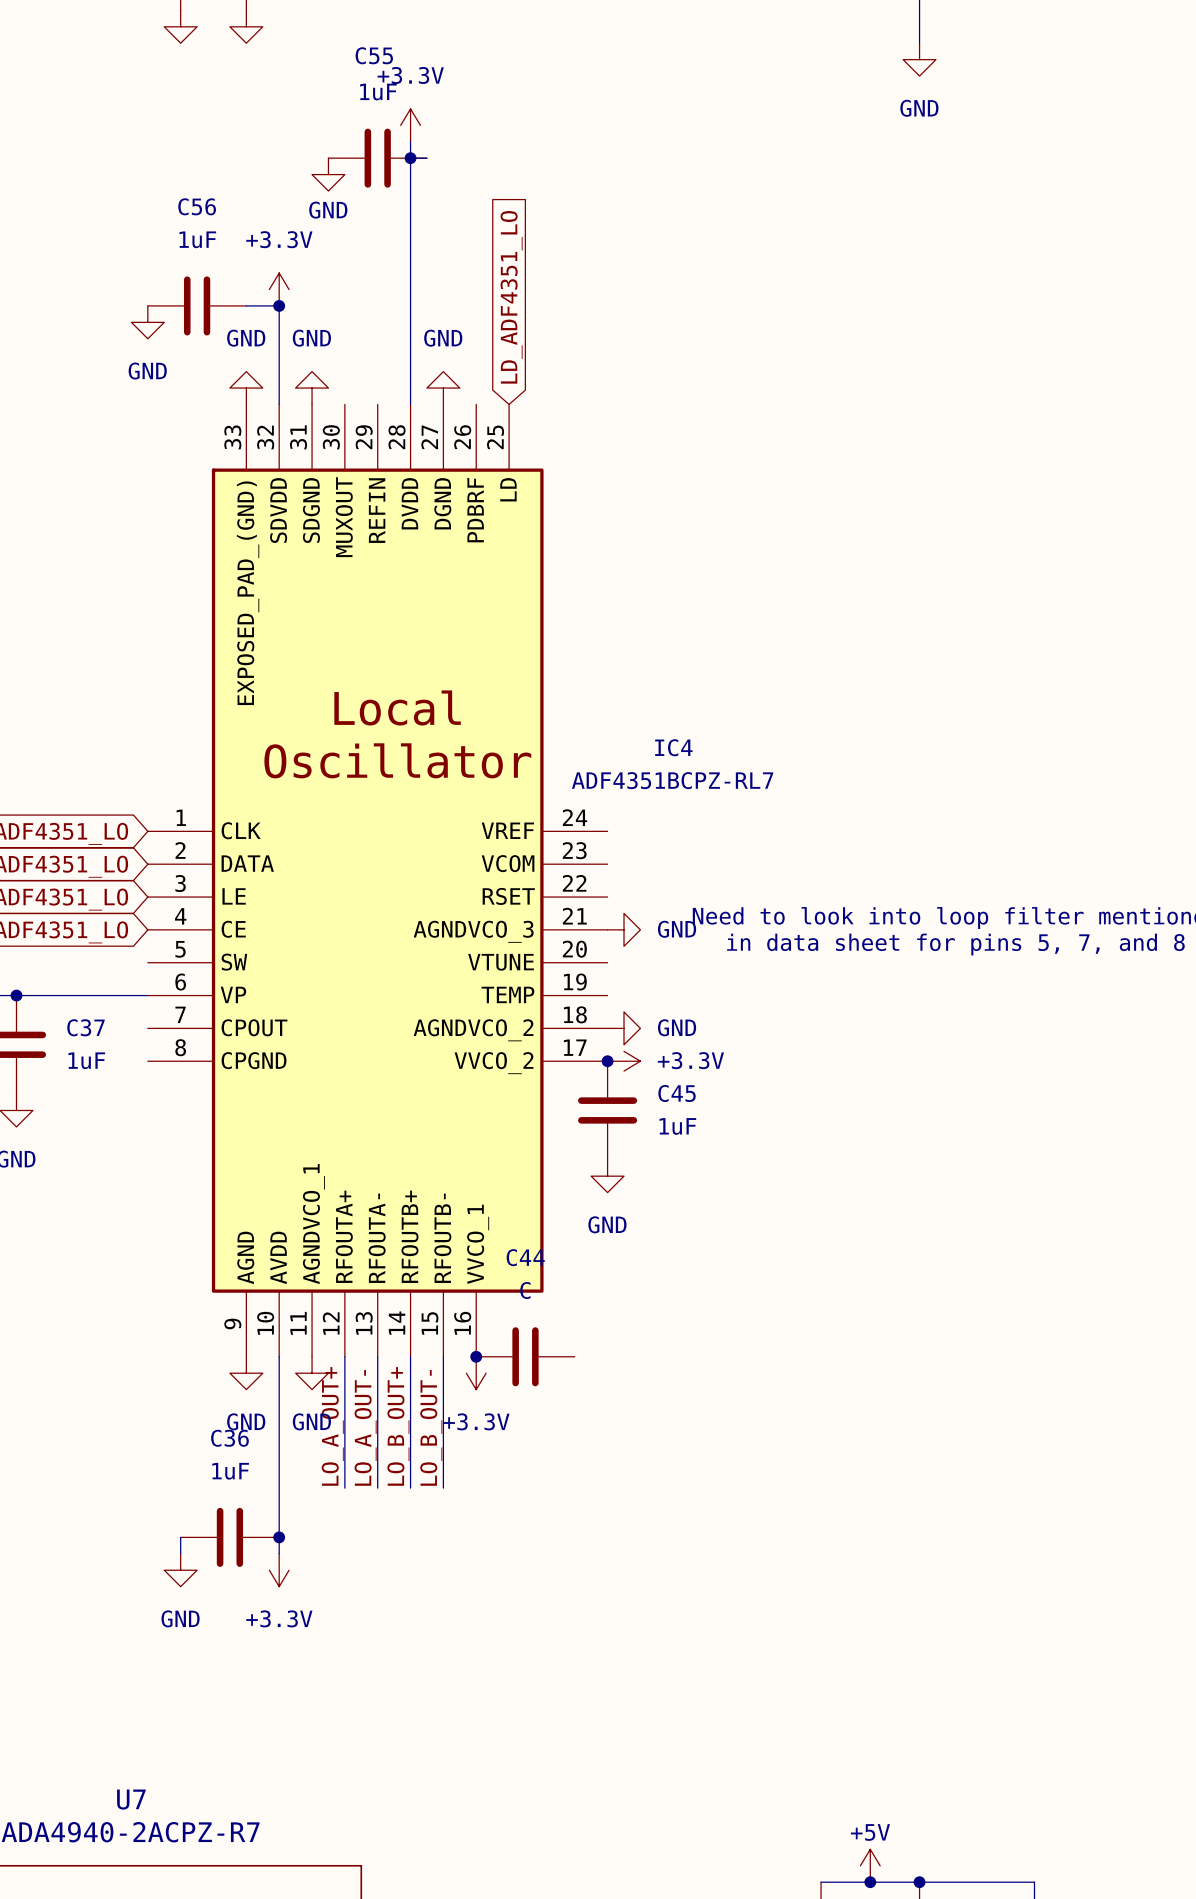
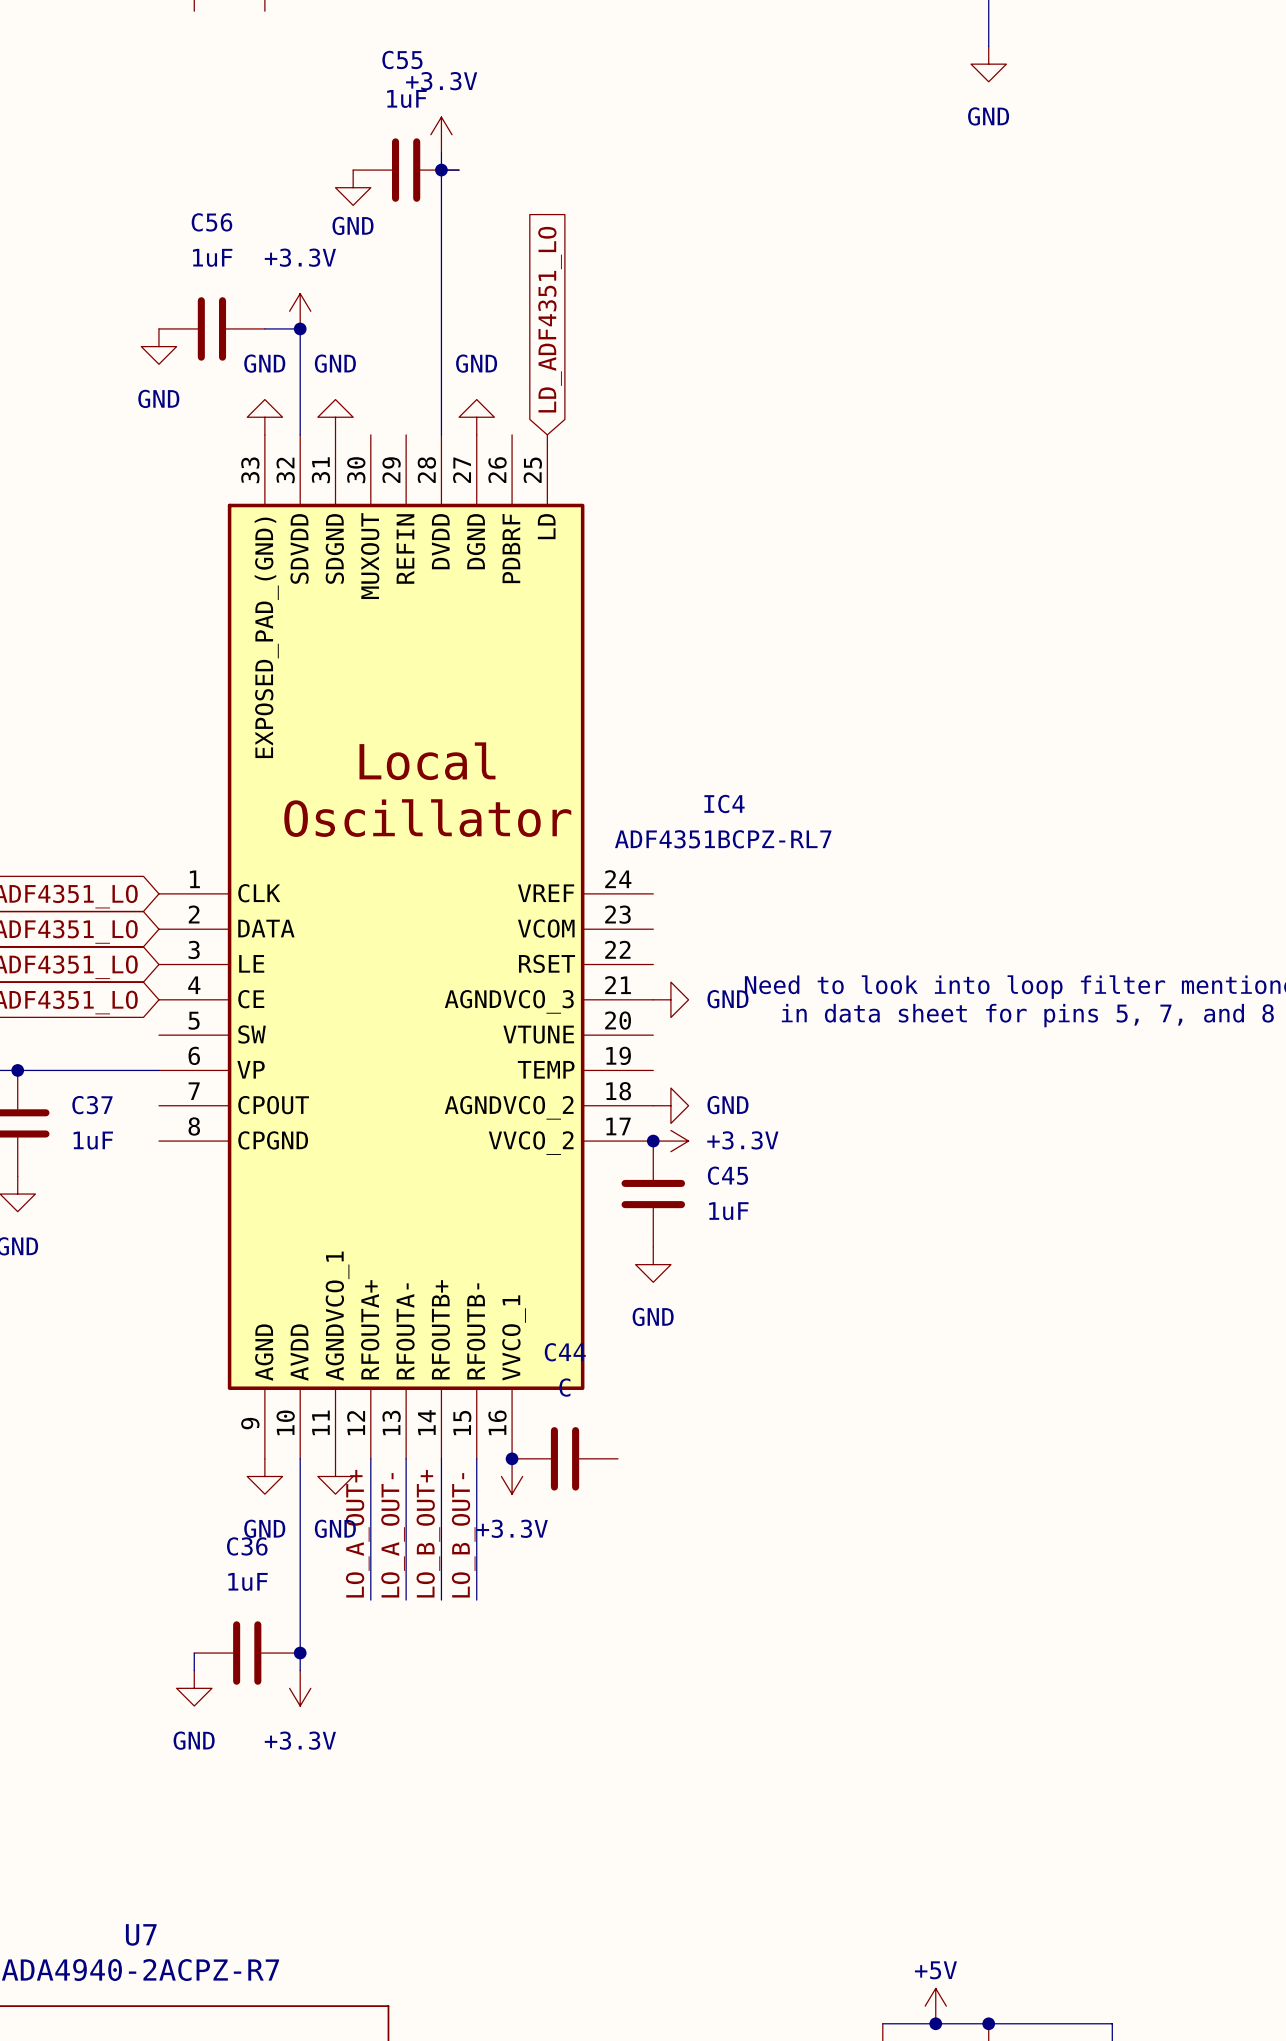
power symbol: (180, 26) -> none
power symbol: (246, 26) -> none

